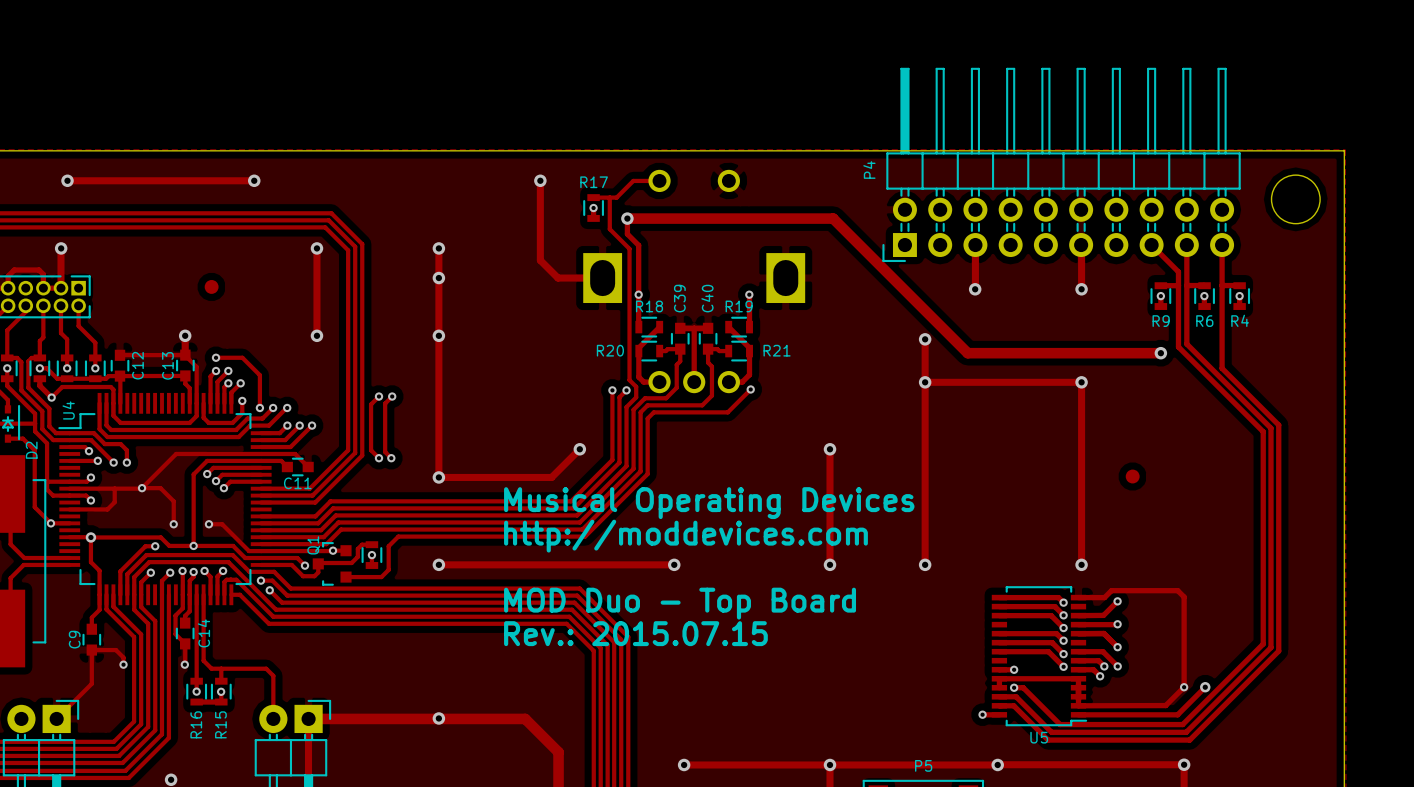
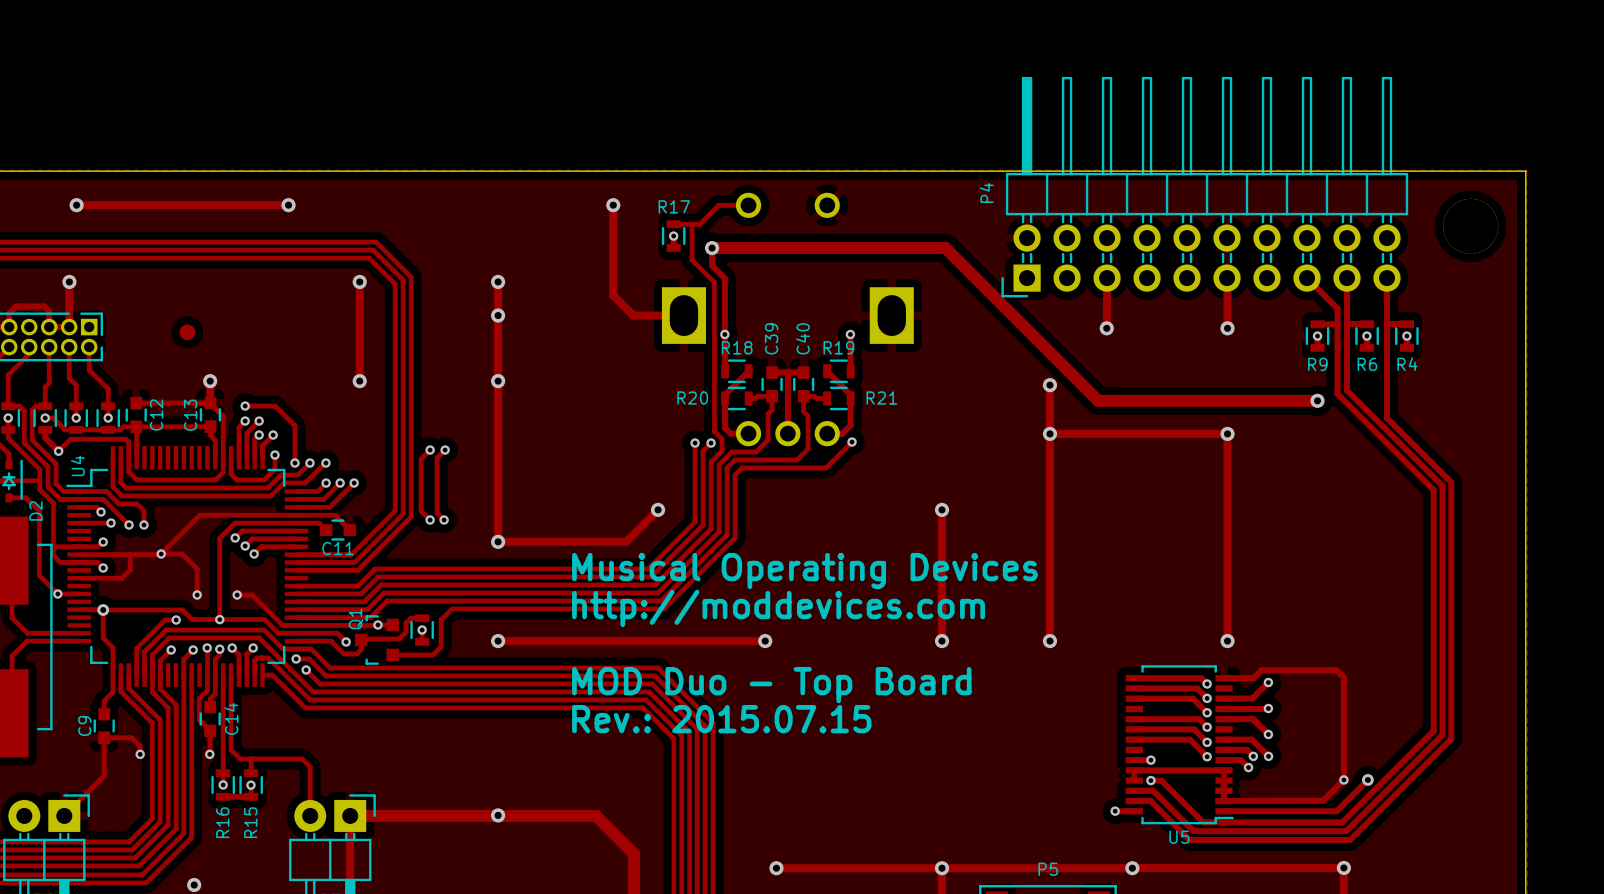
round board edge: [1270, 174, 1321, 225] -> none
part position: (211, 286) -> (187, 332)
part: (1132, 476) -> none

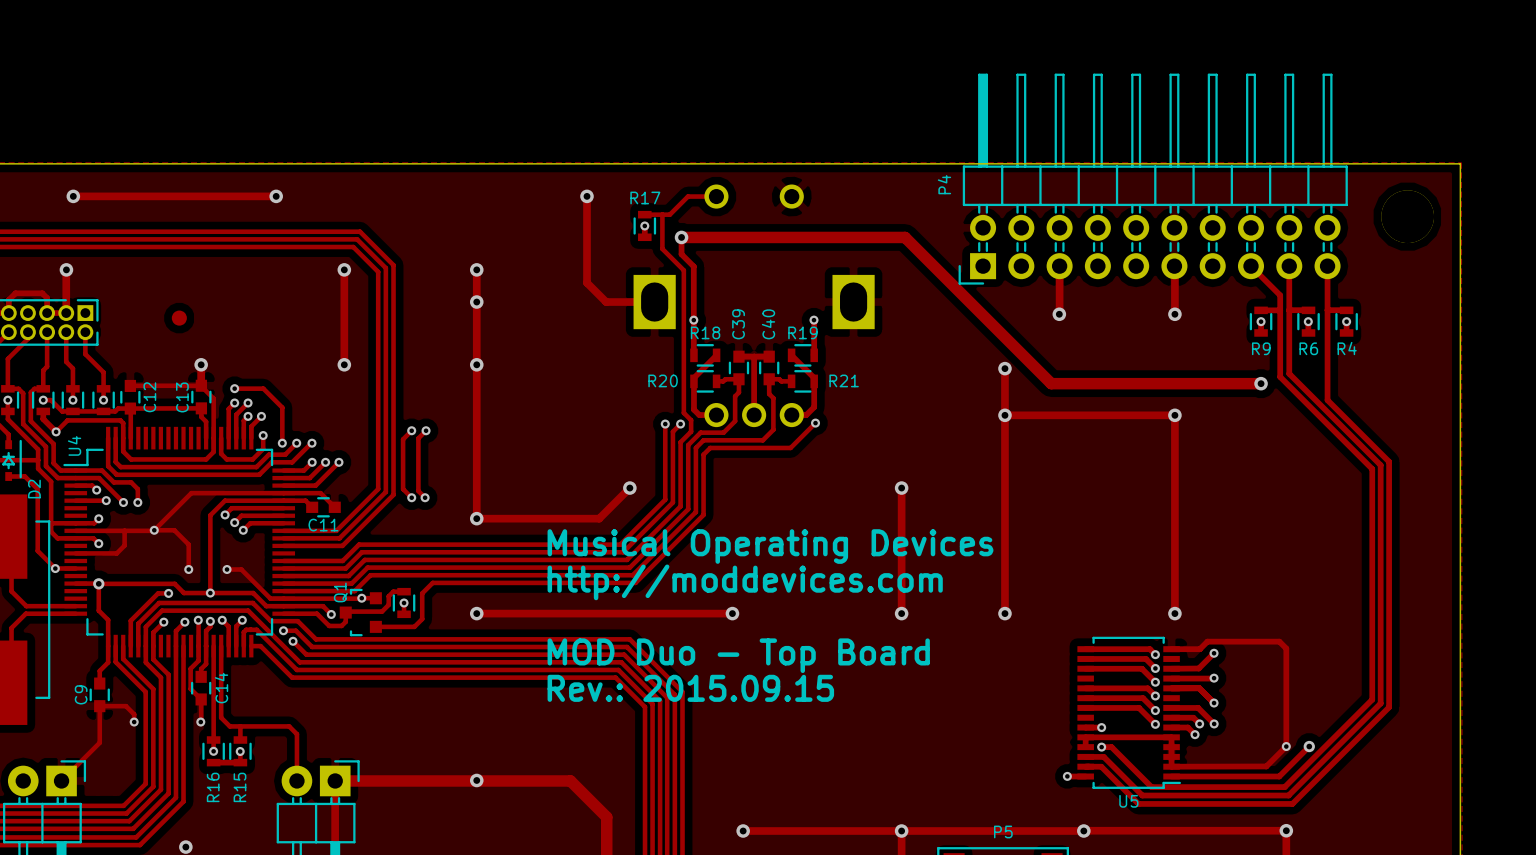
text: Rev.: 2015.07.15 (721, 719) -> Rev.: 2015.09.15 (690, 688)

